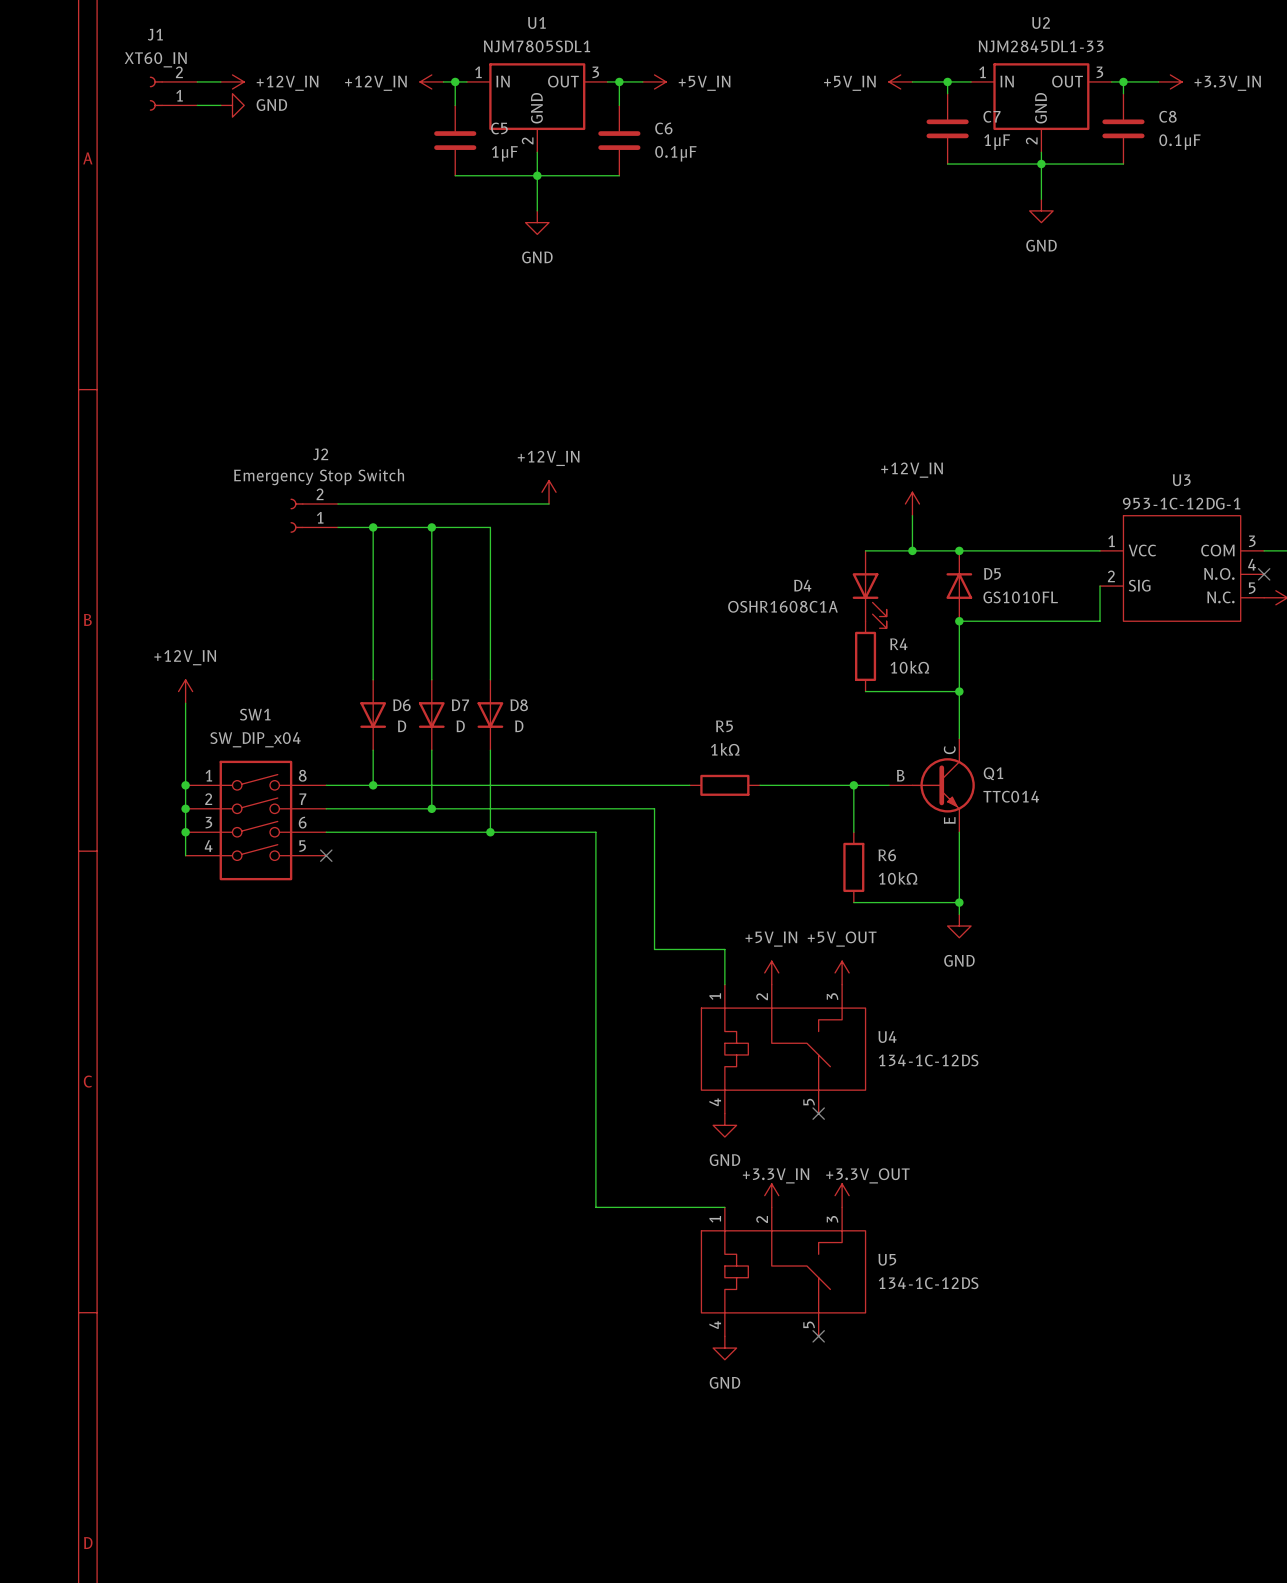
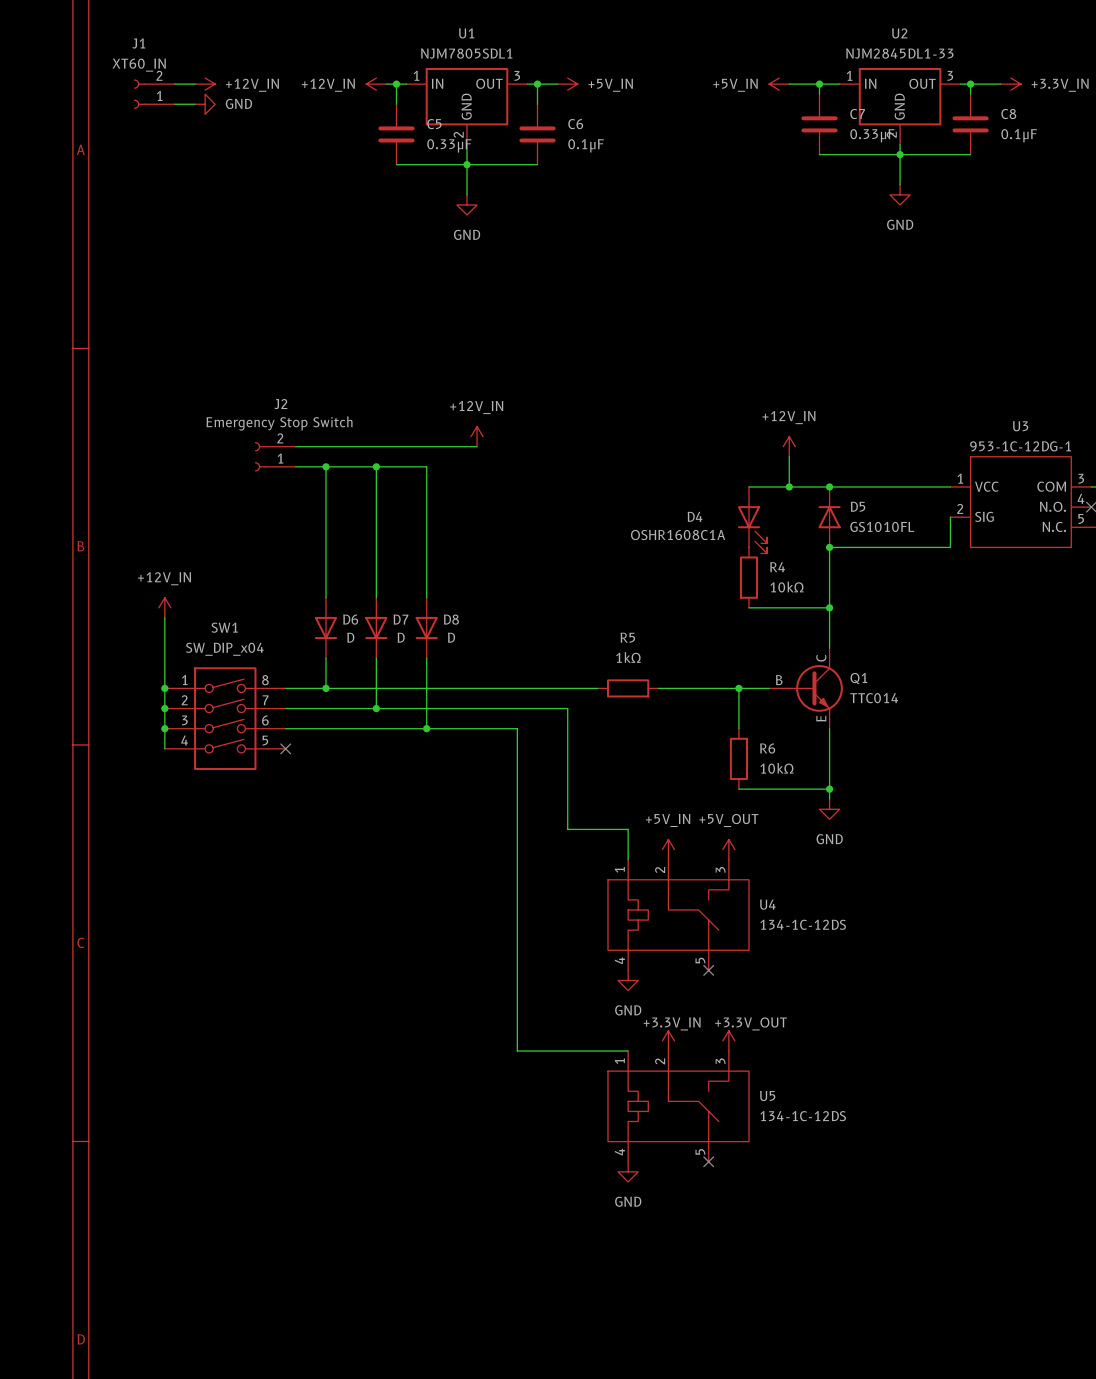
C7 value: 1μF (997, 142) -> 0.33μF (872, 135)
C5 value: 1μF (504, 153) -> 0.33μF (449, 145)

